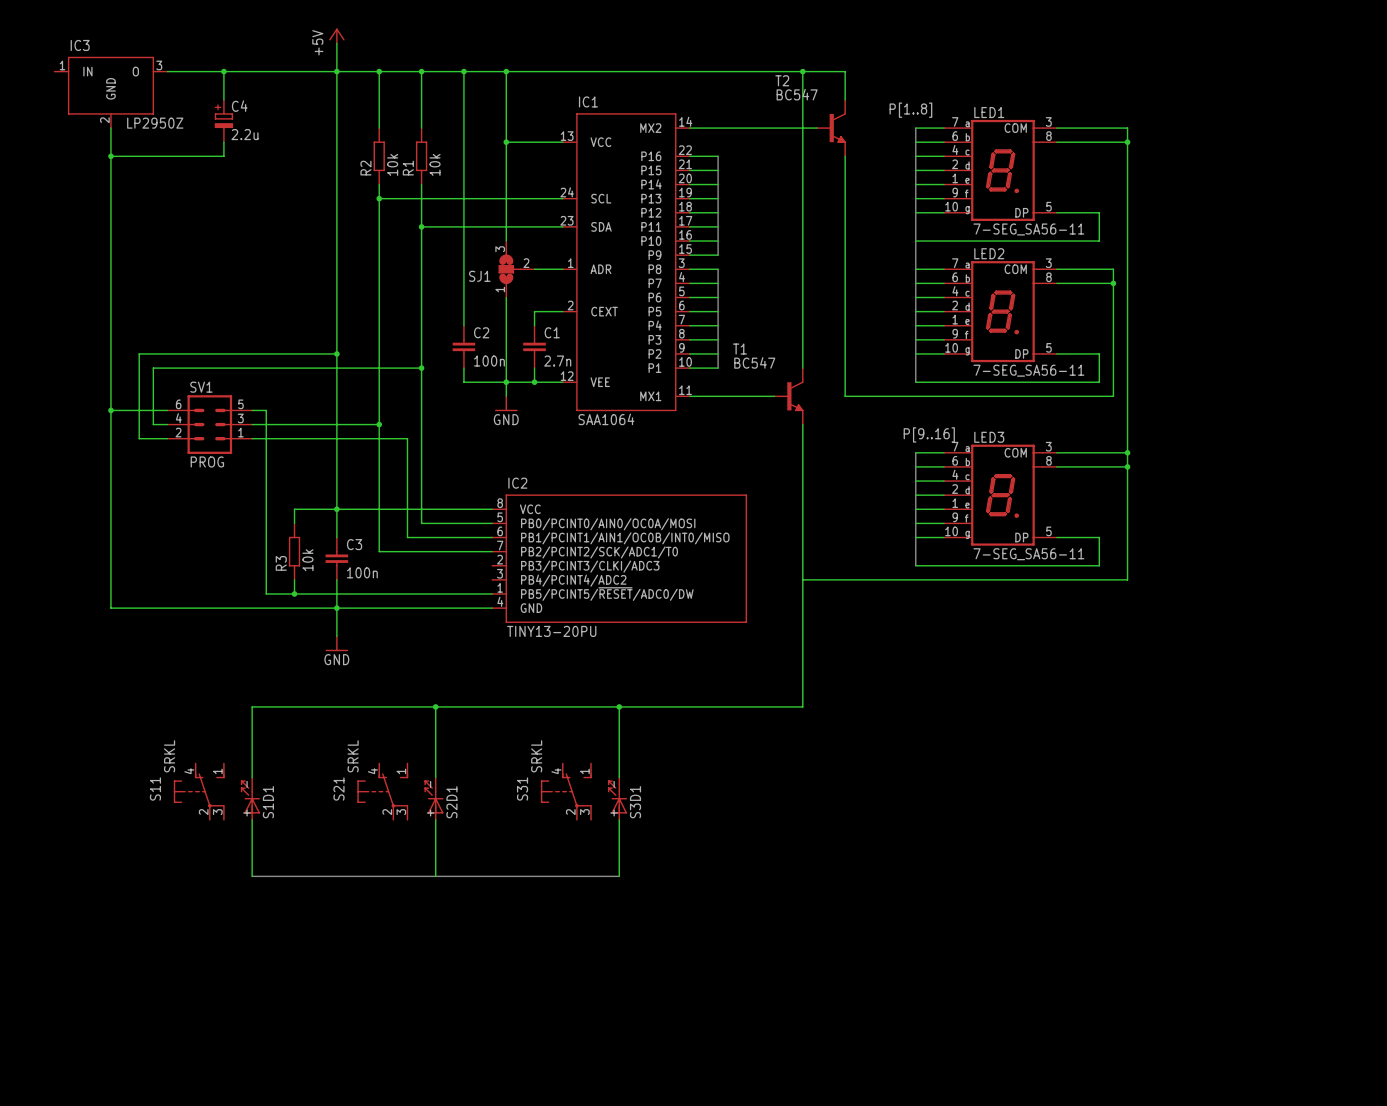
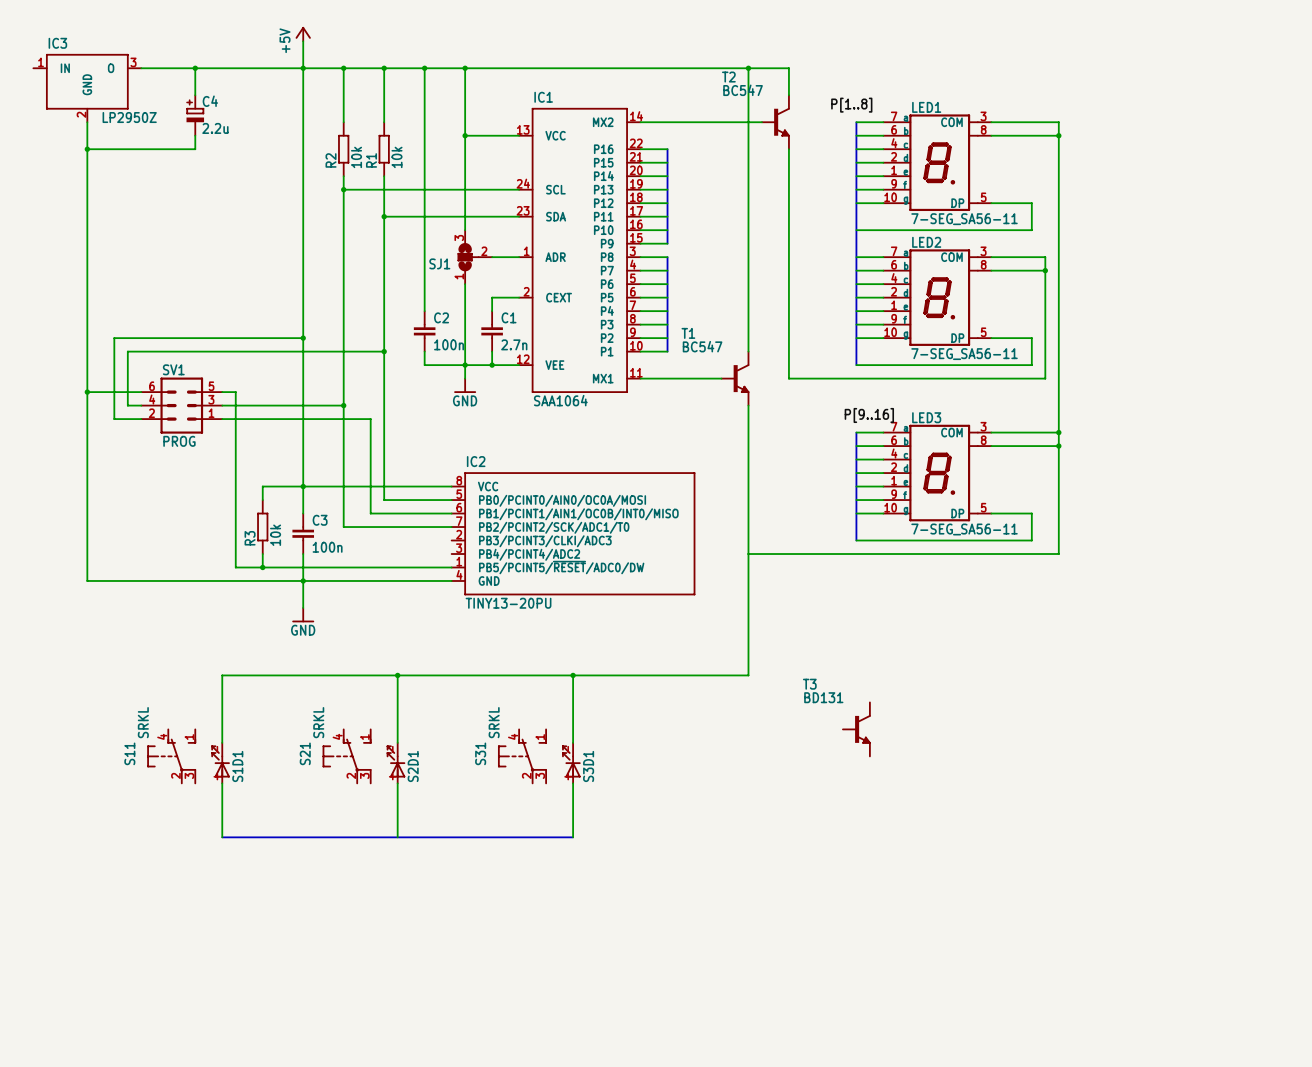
T3: none -> BD131 (856, 729)

